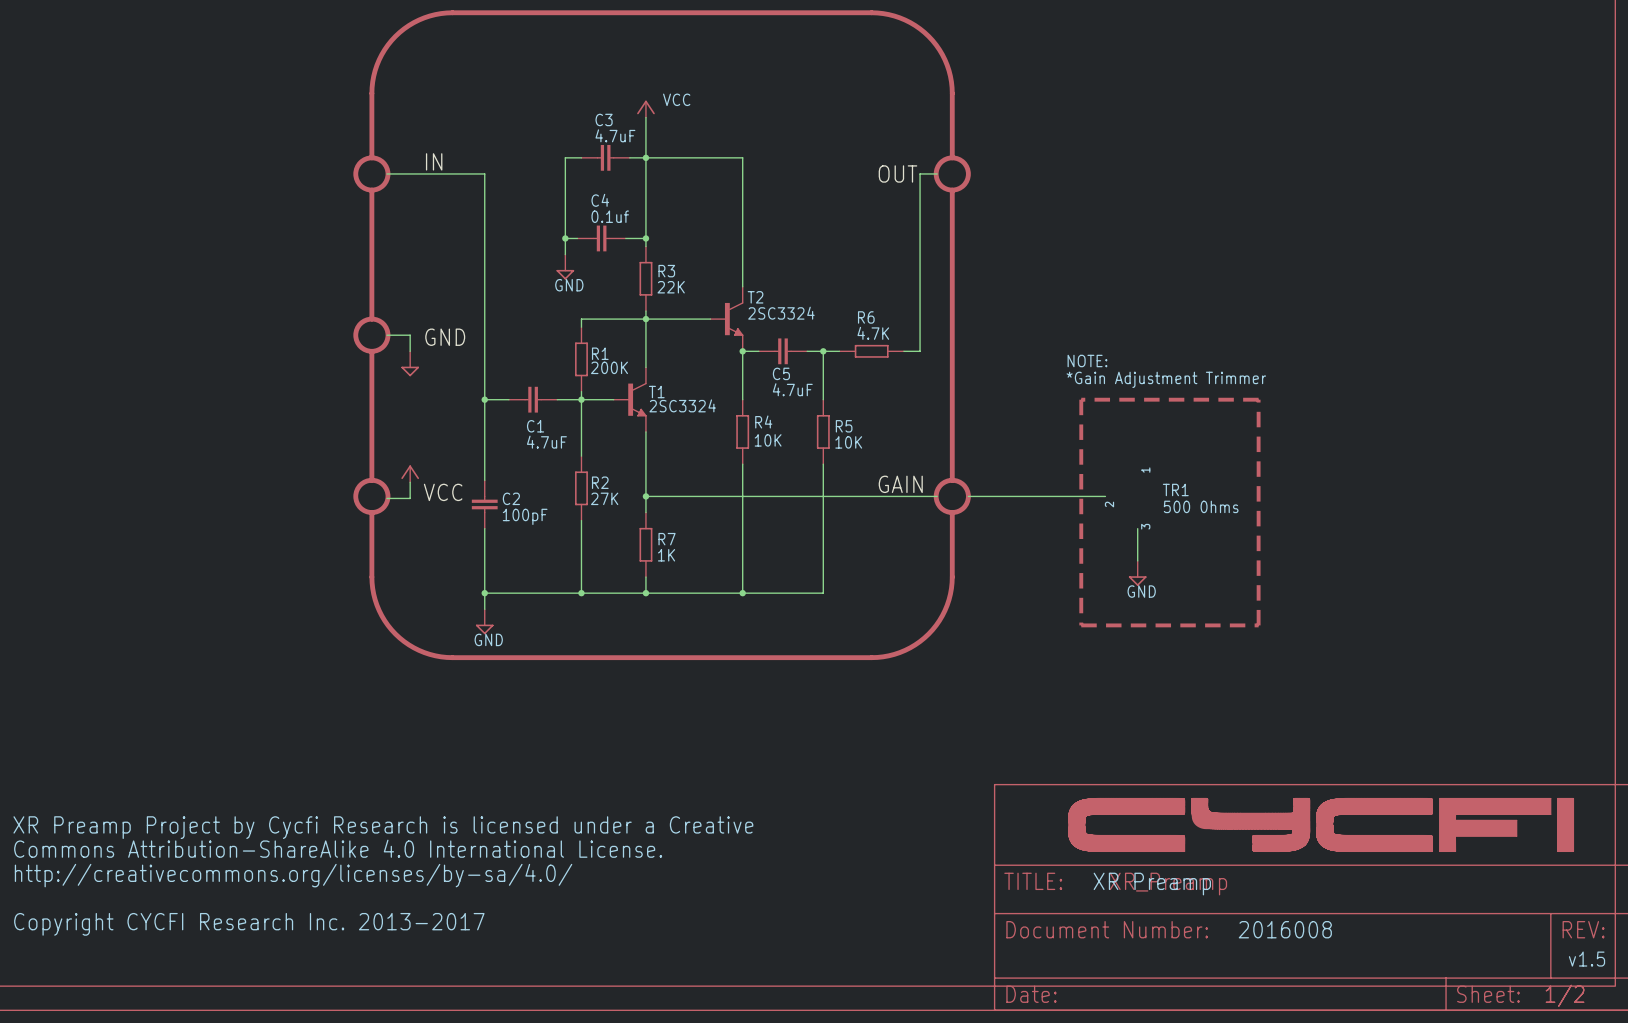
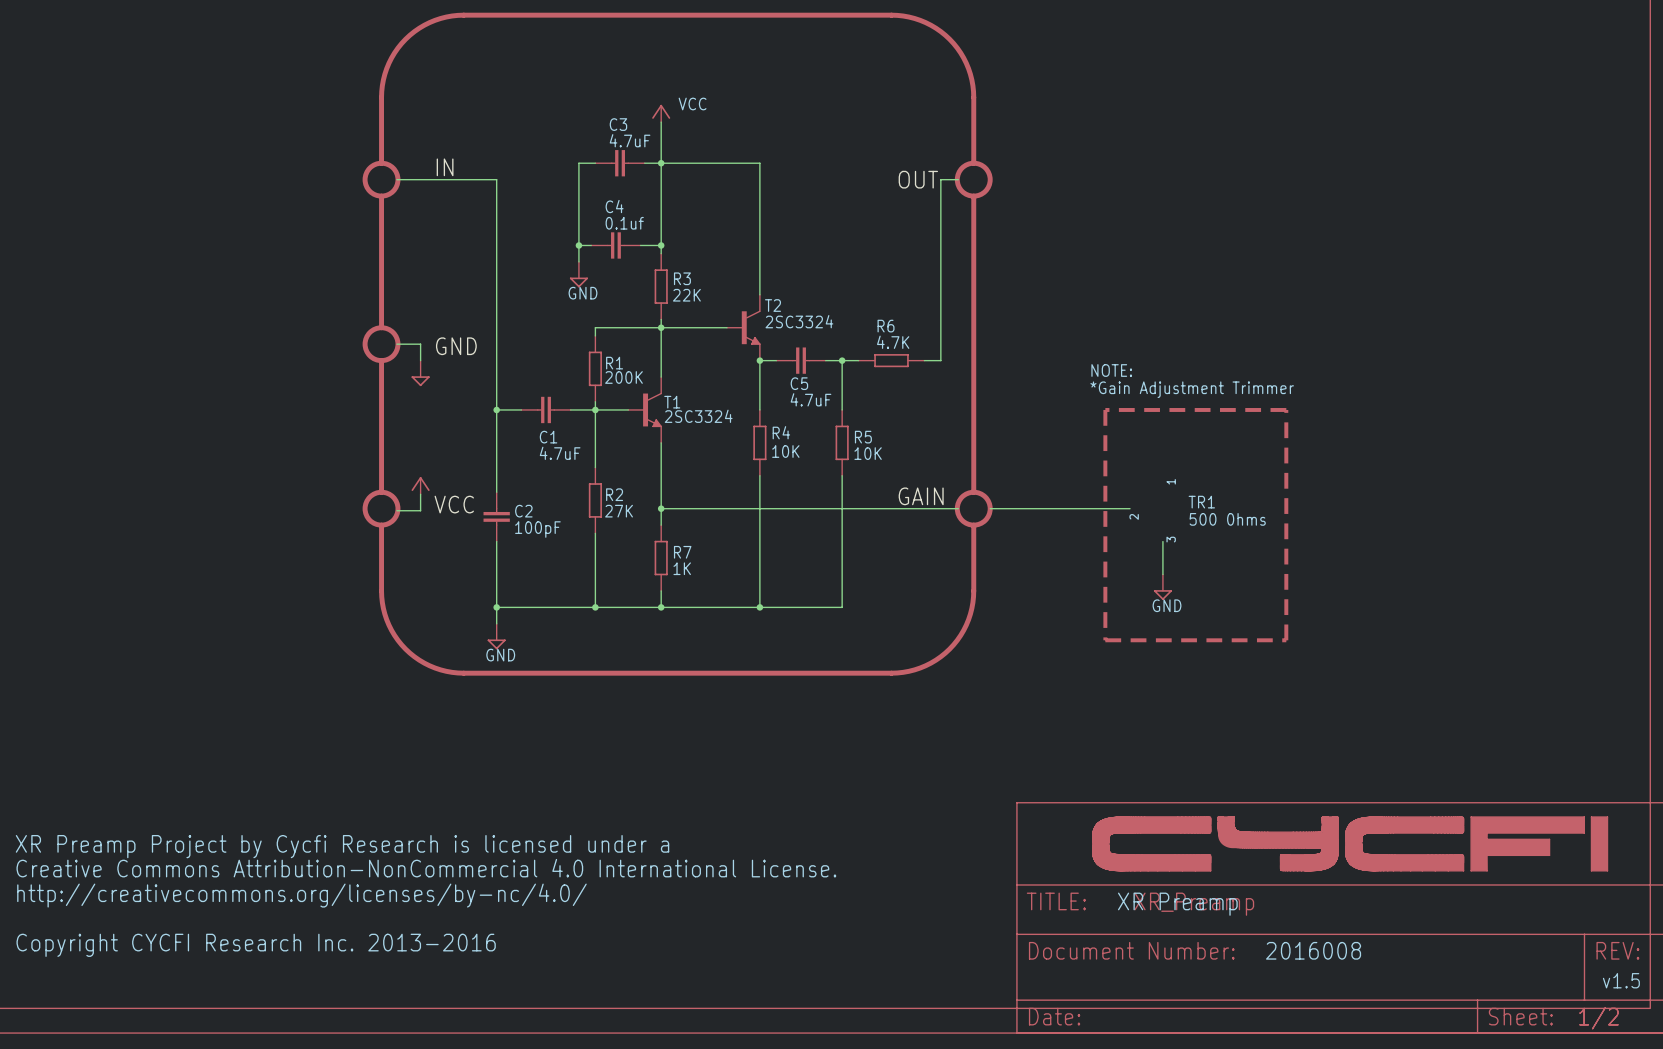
text: XR Preamp Project by Cycfi Research is licensed under a Creative (383, 827) -> XR Preamp Project by Cycfi Research is licensed under a (342, 846)
text: Commons Attribution-ShareAlike 4.0 International License. (338, 848) -> Creative Commons Attribution-NonCommercial 4.0 International License. (426, 868)
text: http://creativecommons.org/licenses/by-sa/4.0/ (293, 875) -> http://creativecommons.org/licenses/by-nc/4.0/ (301, 895)
text: Copyright CYCFI Research Inc. 2013-2017 (249, 924) -> Copyright CYCFI Research Inc. 2013-2016 (256, 945)

